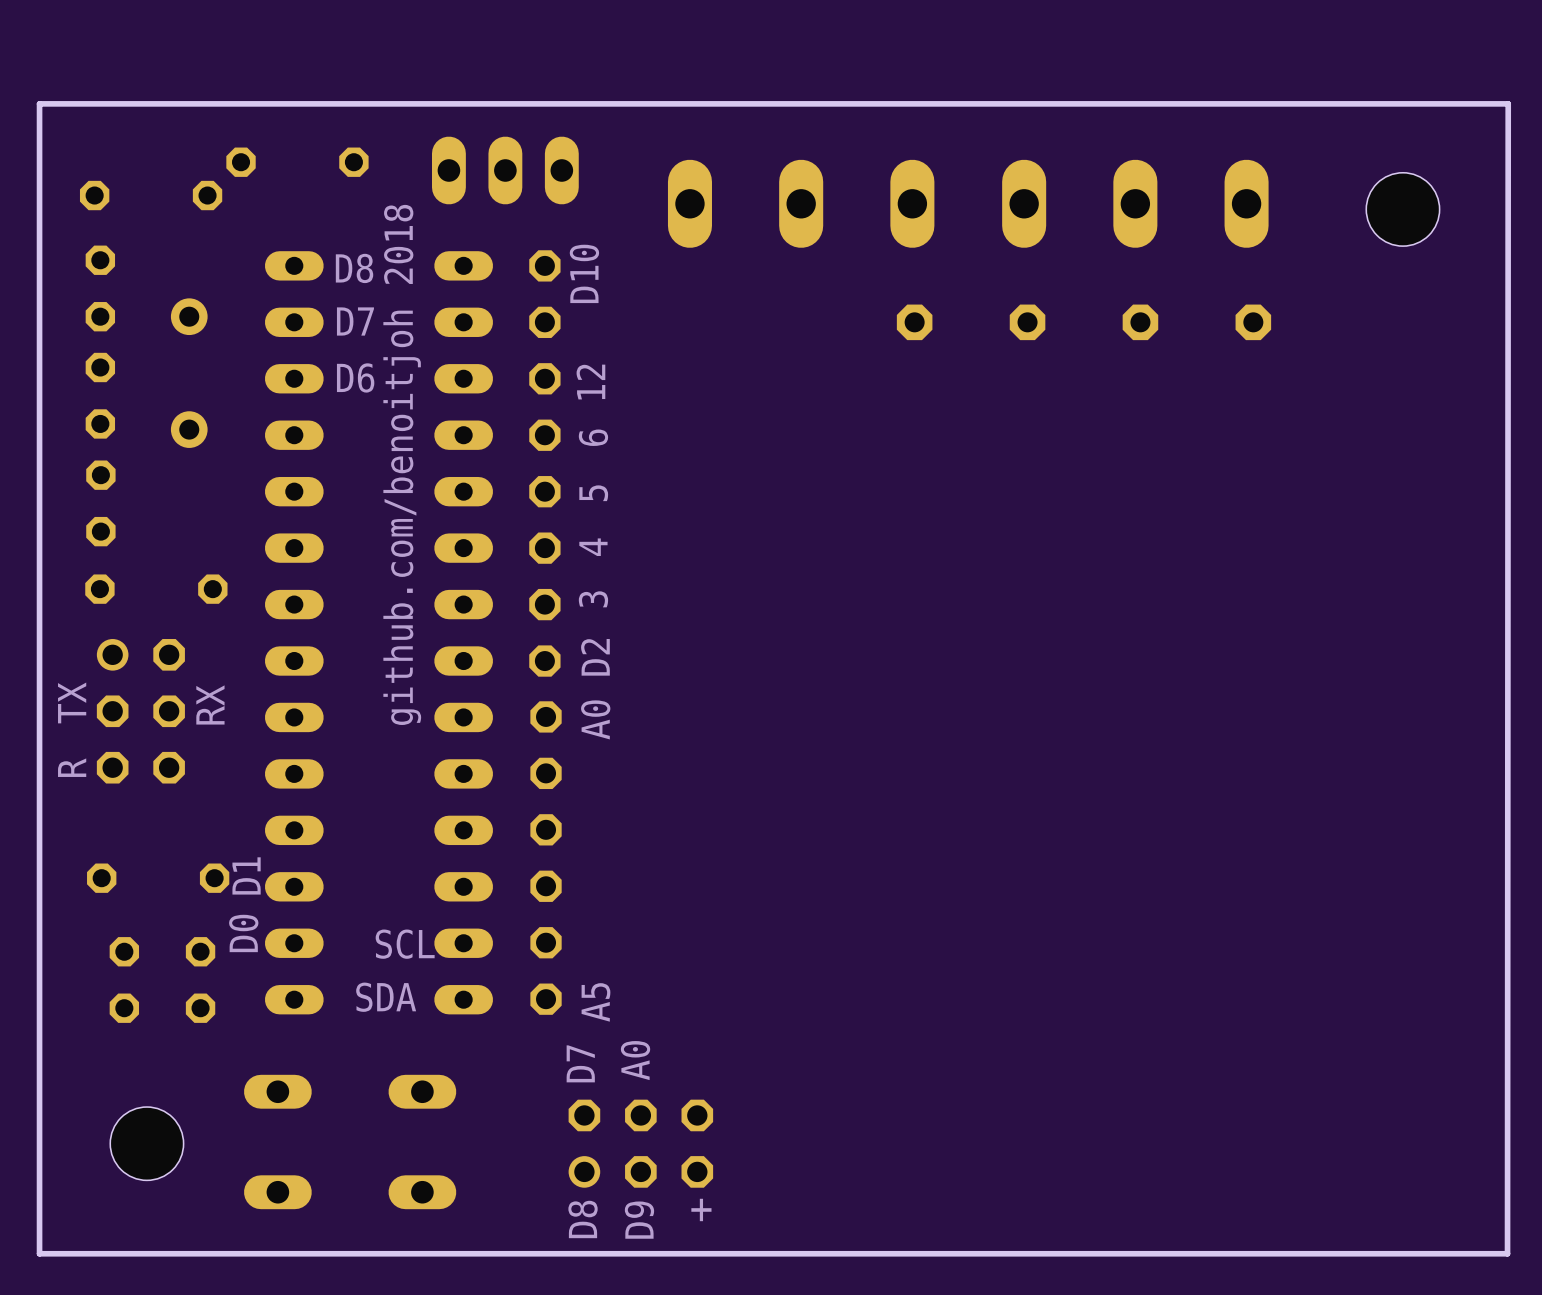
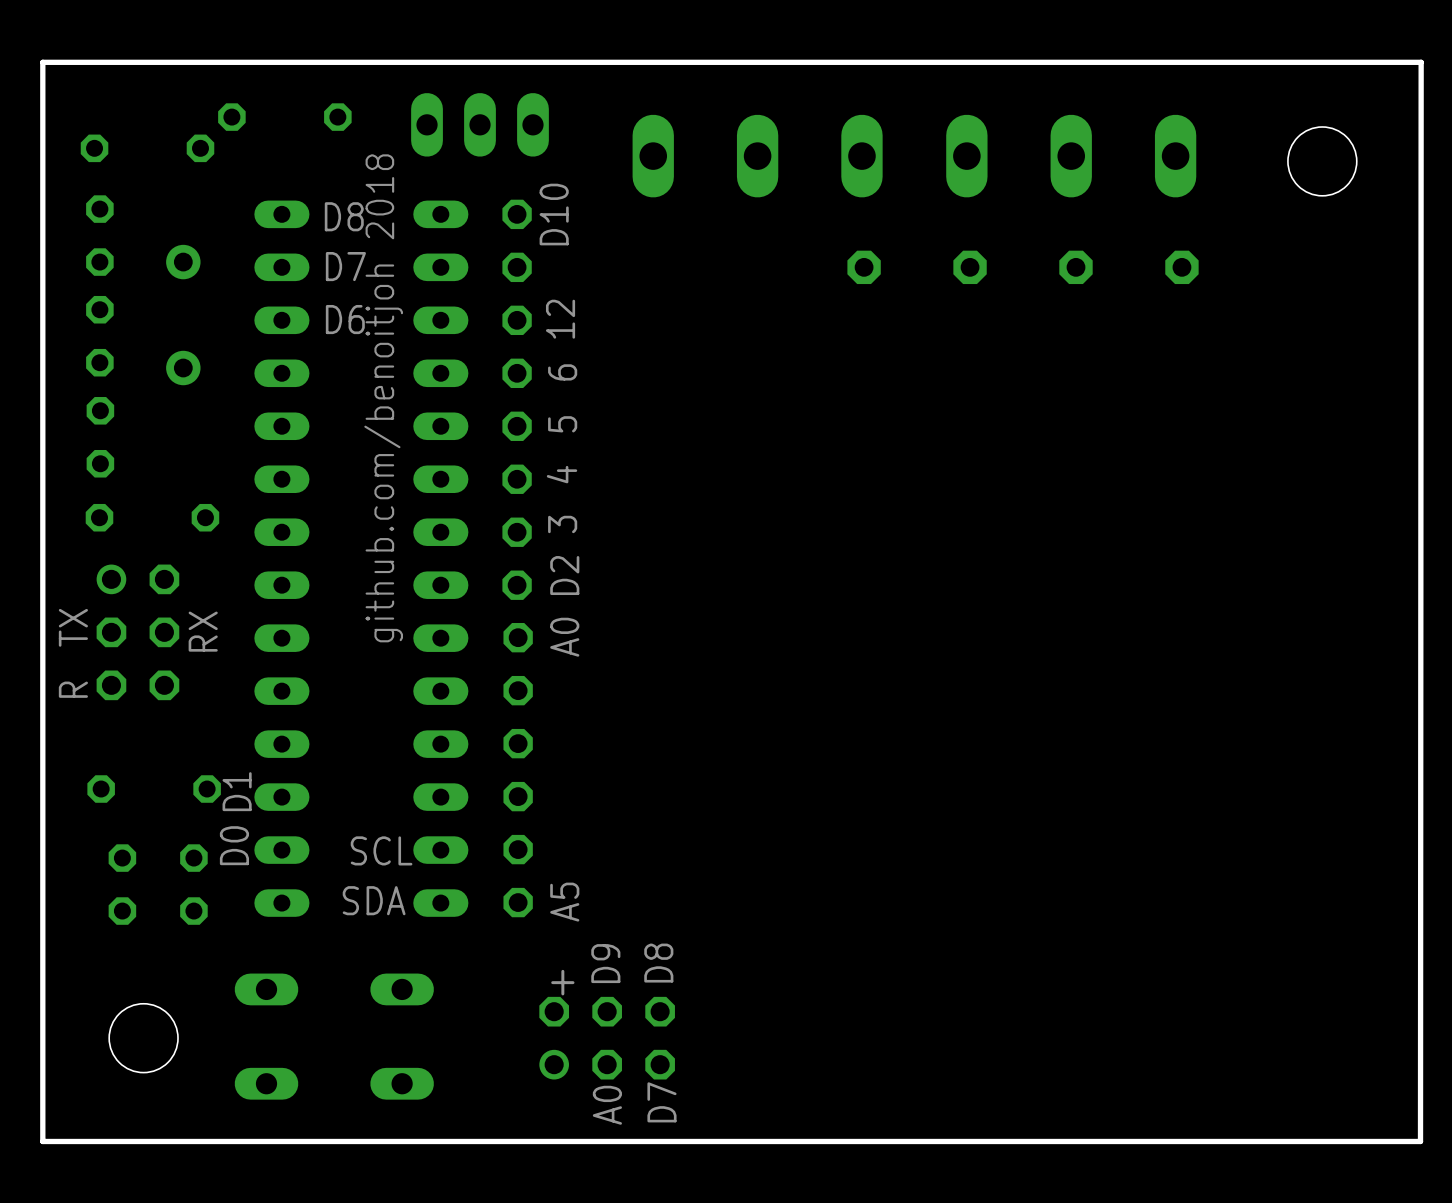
text position: A0 (635, 1060) -> A0 (607, 1105)
text position: D7 (580, 1063) -> D7 (661, 1102)
text position: + (701, 1209) -> + (562, 982)
text position: D8 (583, 1219) -> D8 (658, 963)
text position: D9 (639, 1220) -> D9 (605, 963)

